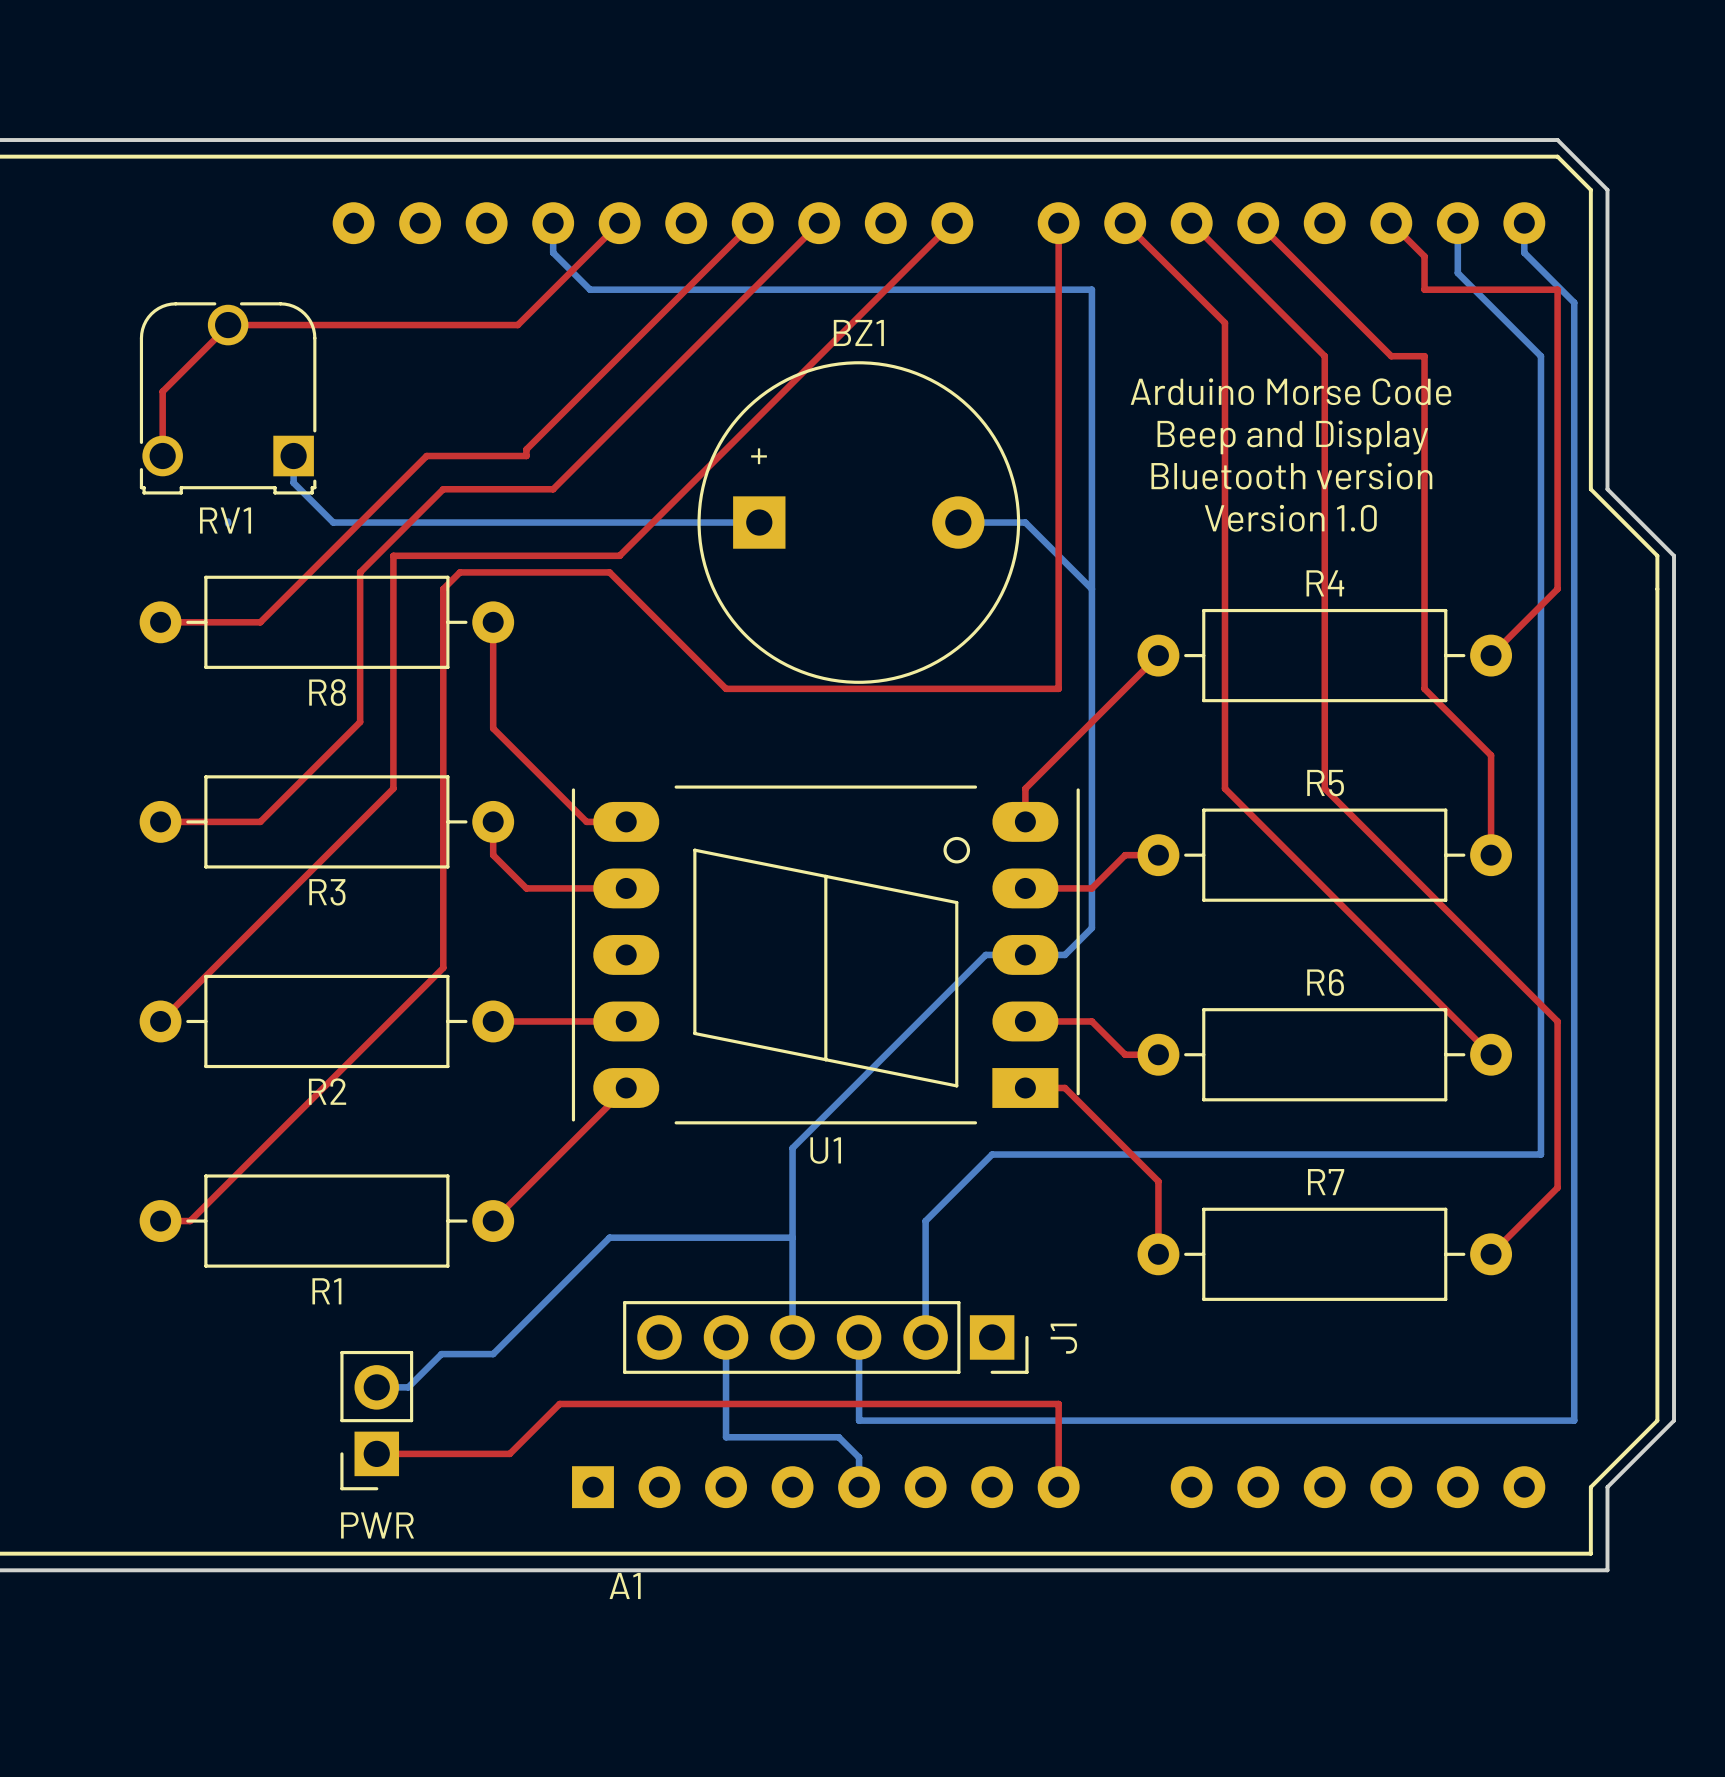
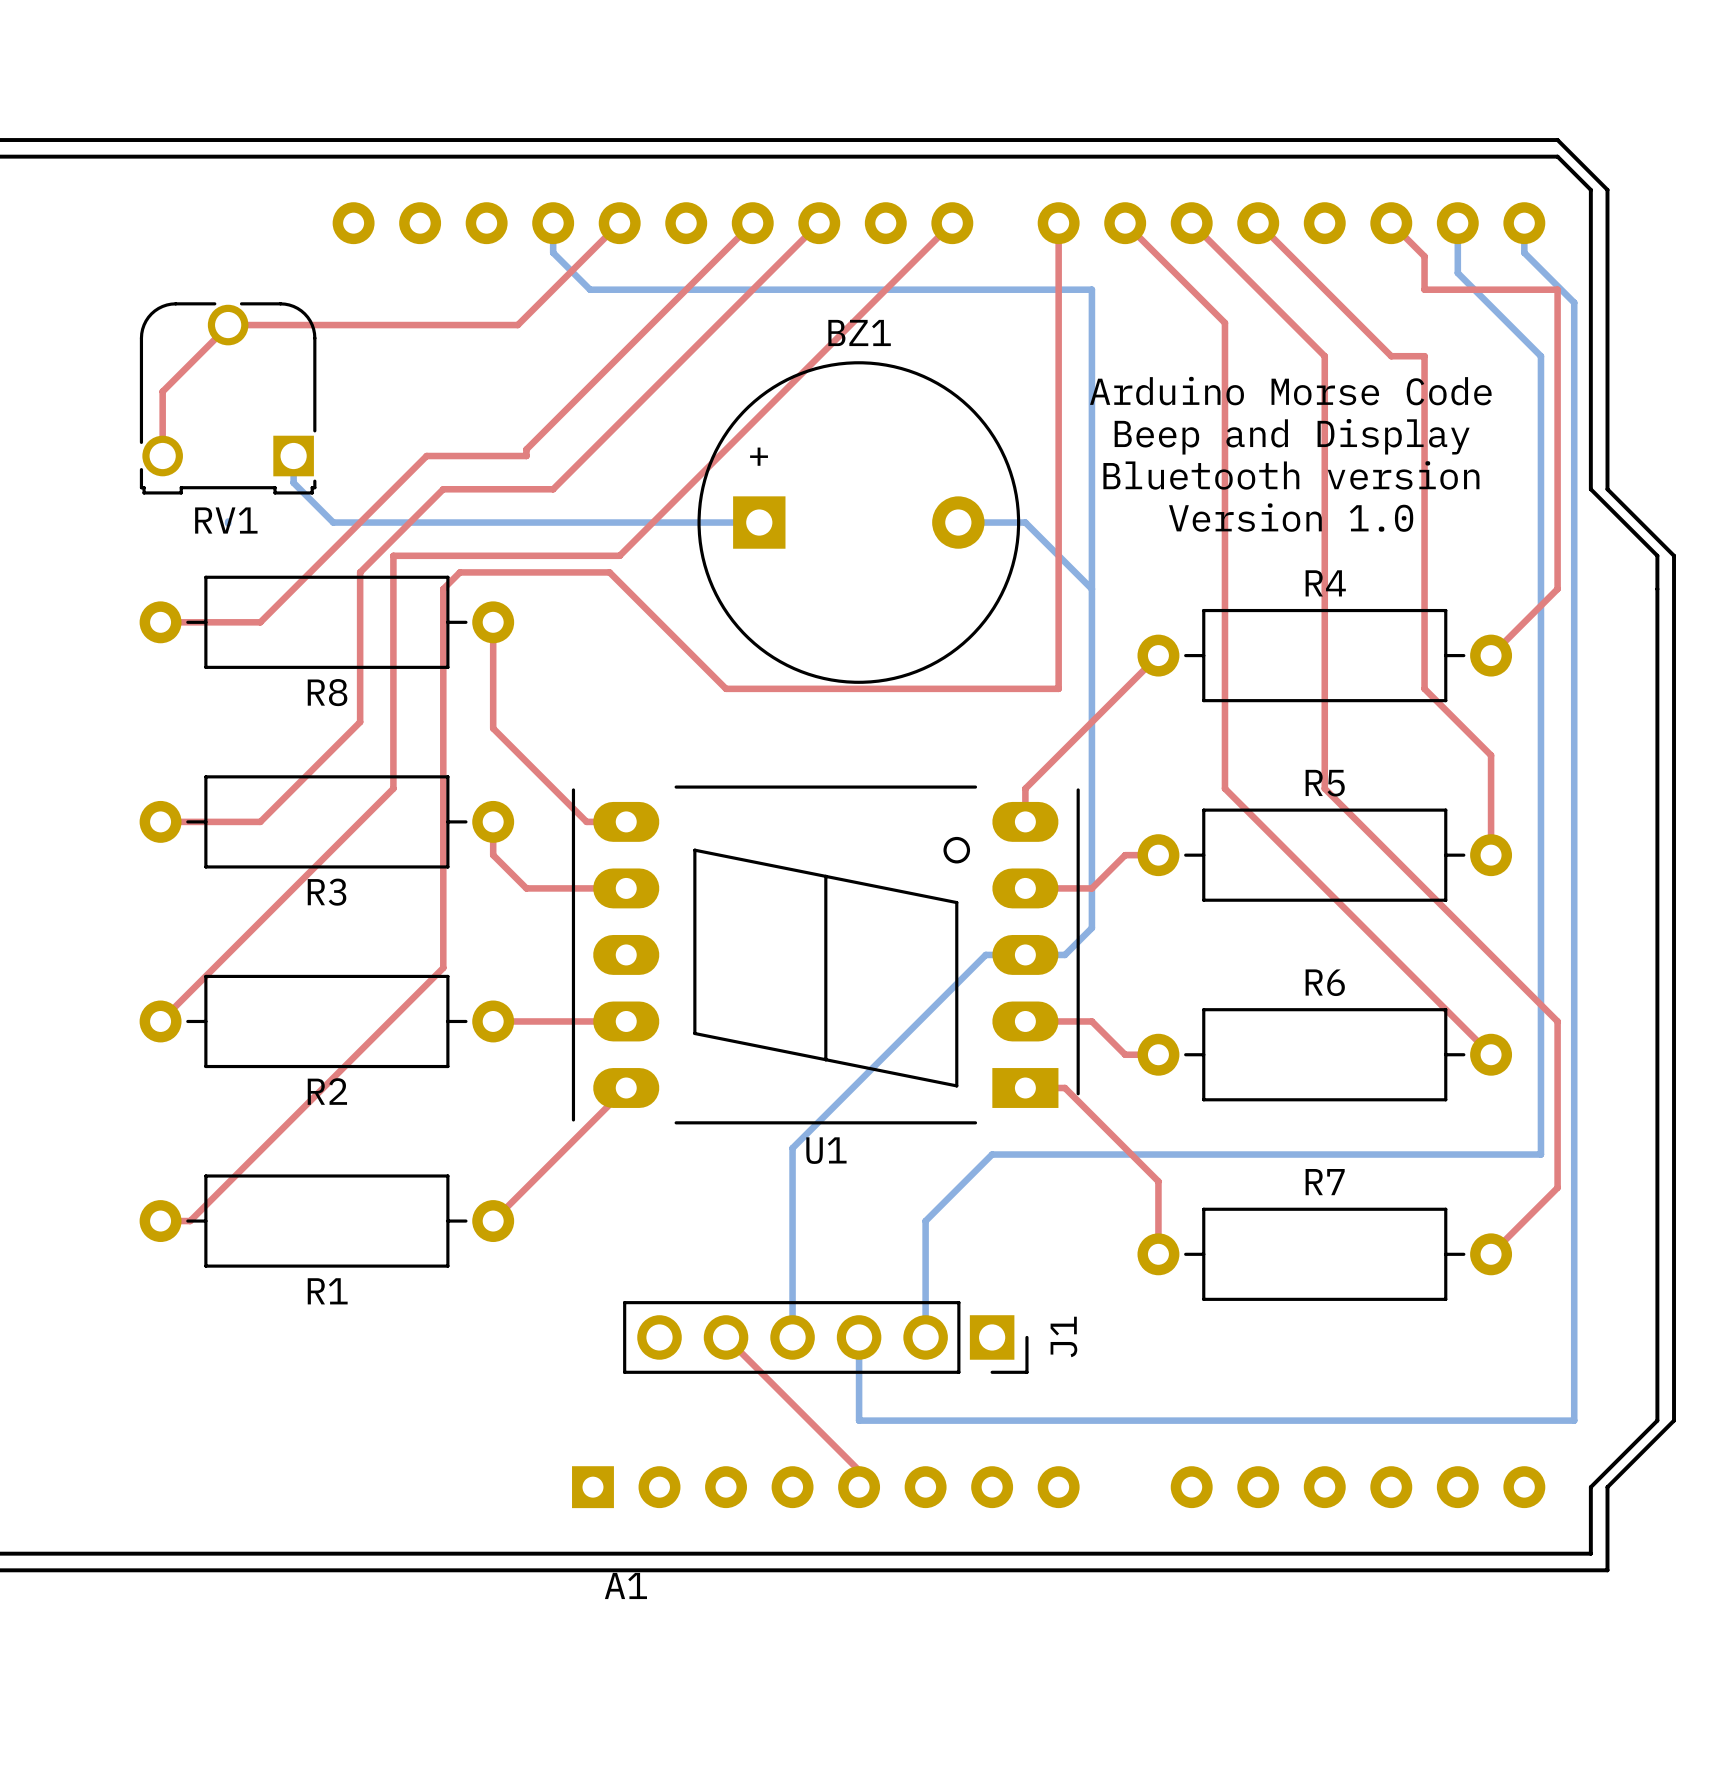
bottom track: (792, 1237) (609, 1237) (493, 1354) (441, 1354) (408, 1387) (376, 1387) -> none
bottom track: (726, 1337) (726, 1437) (838, 1437) (859, 1457) (859, 1487) -> none
top track: none -> (726, 1337) (859, 1470) (859, 1487)
PWR: (376, 1420) -> none
top track: (376, 1453) (509, 1453) (559, 1403) (1058, 1403) (1058, 1487) -> none

